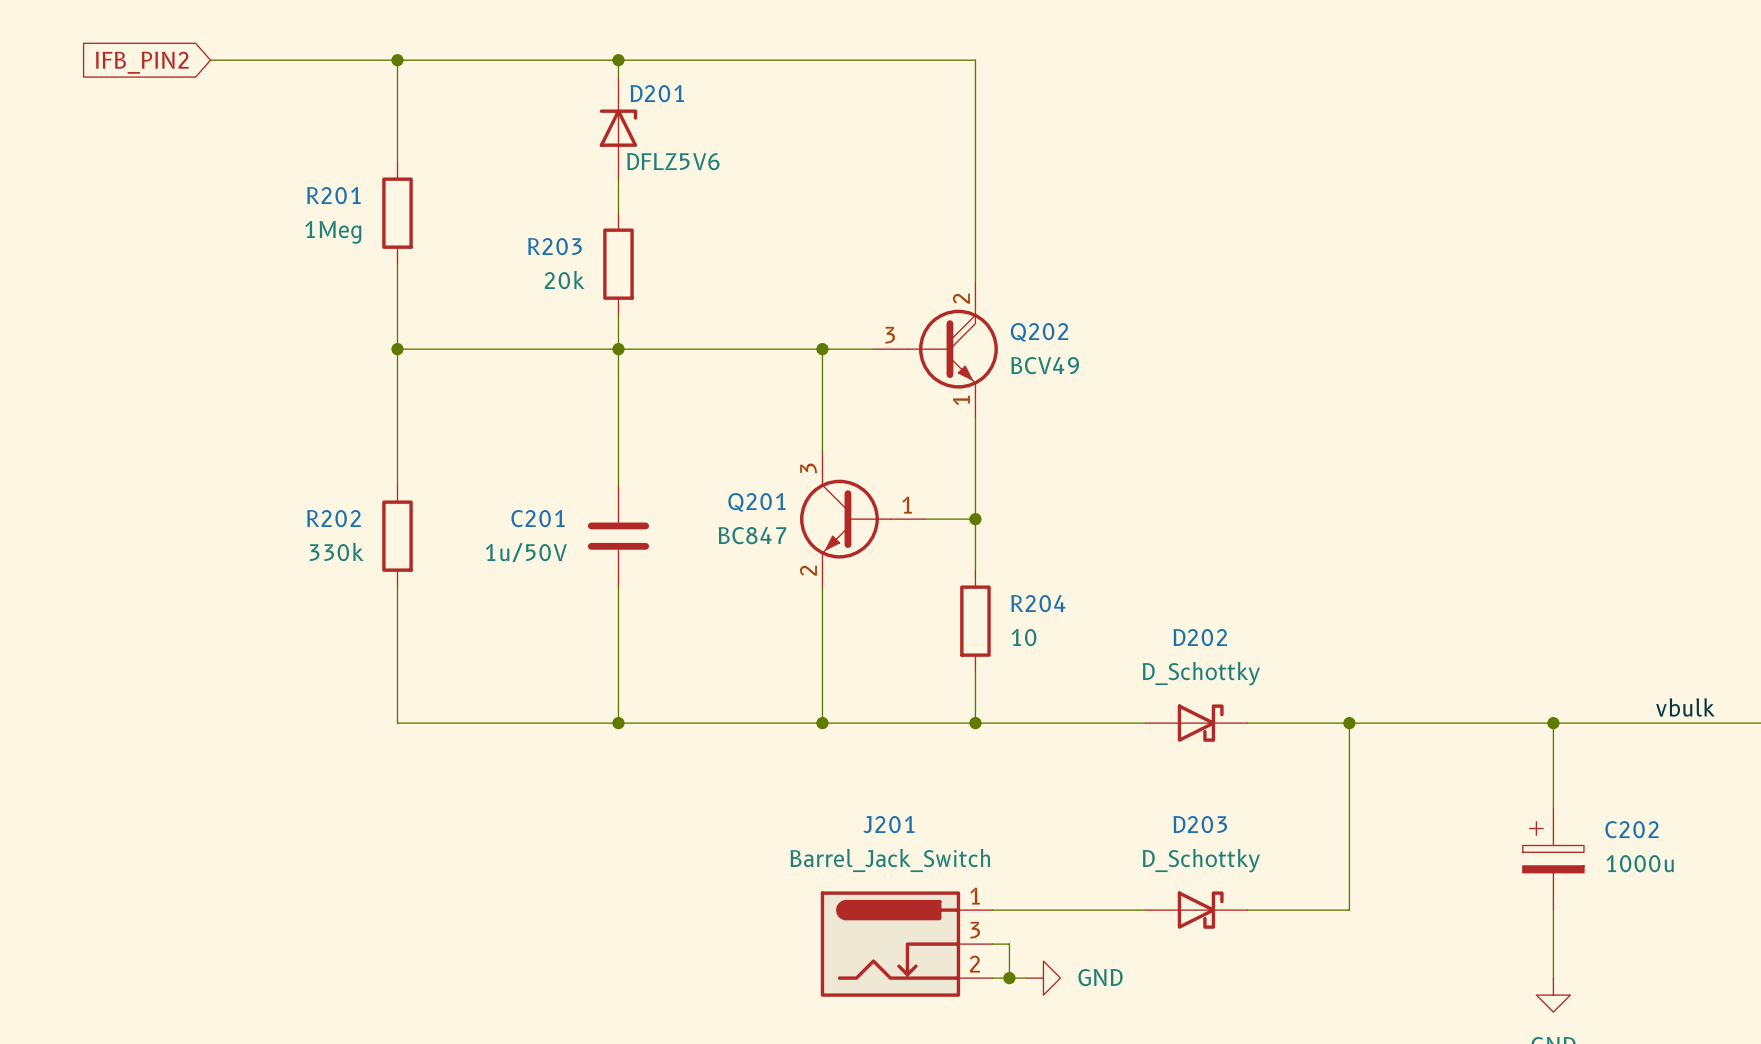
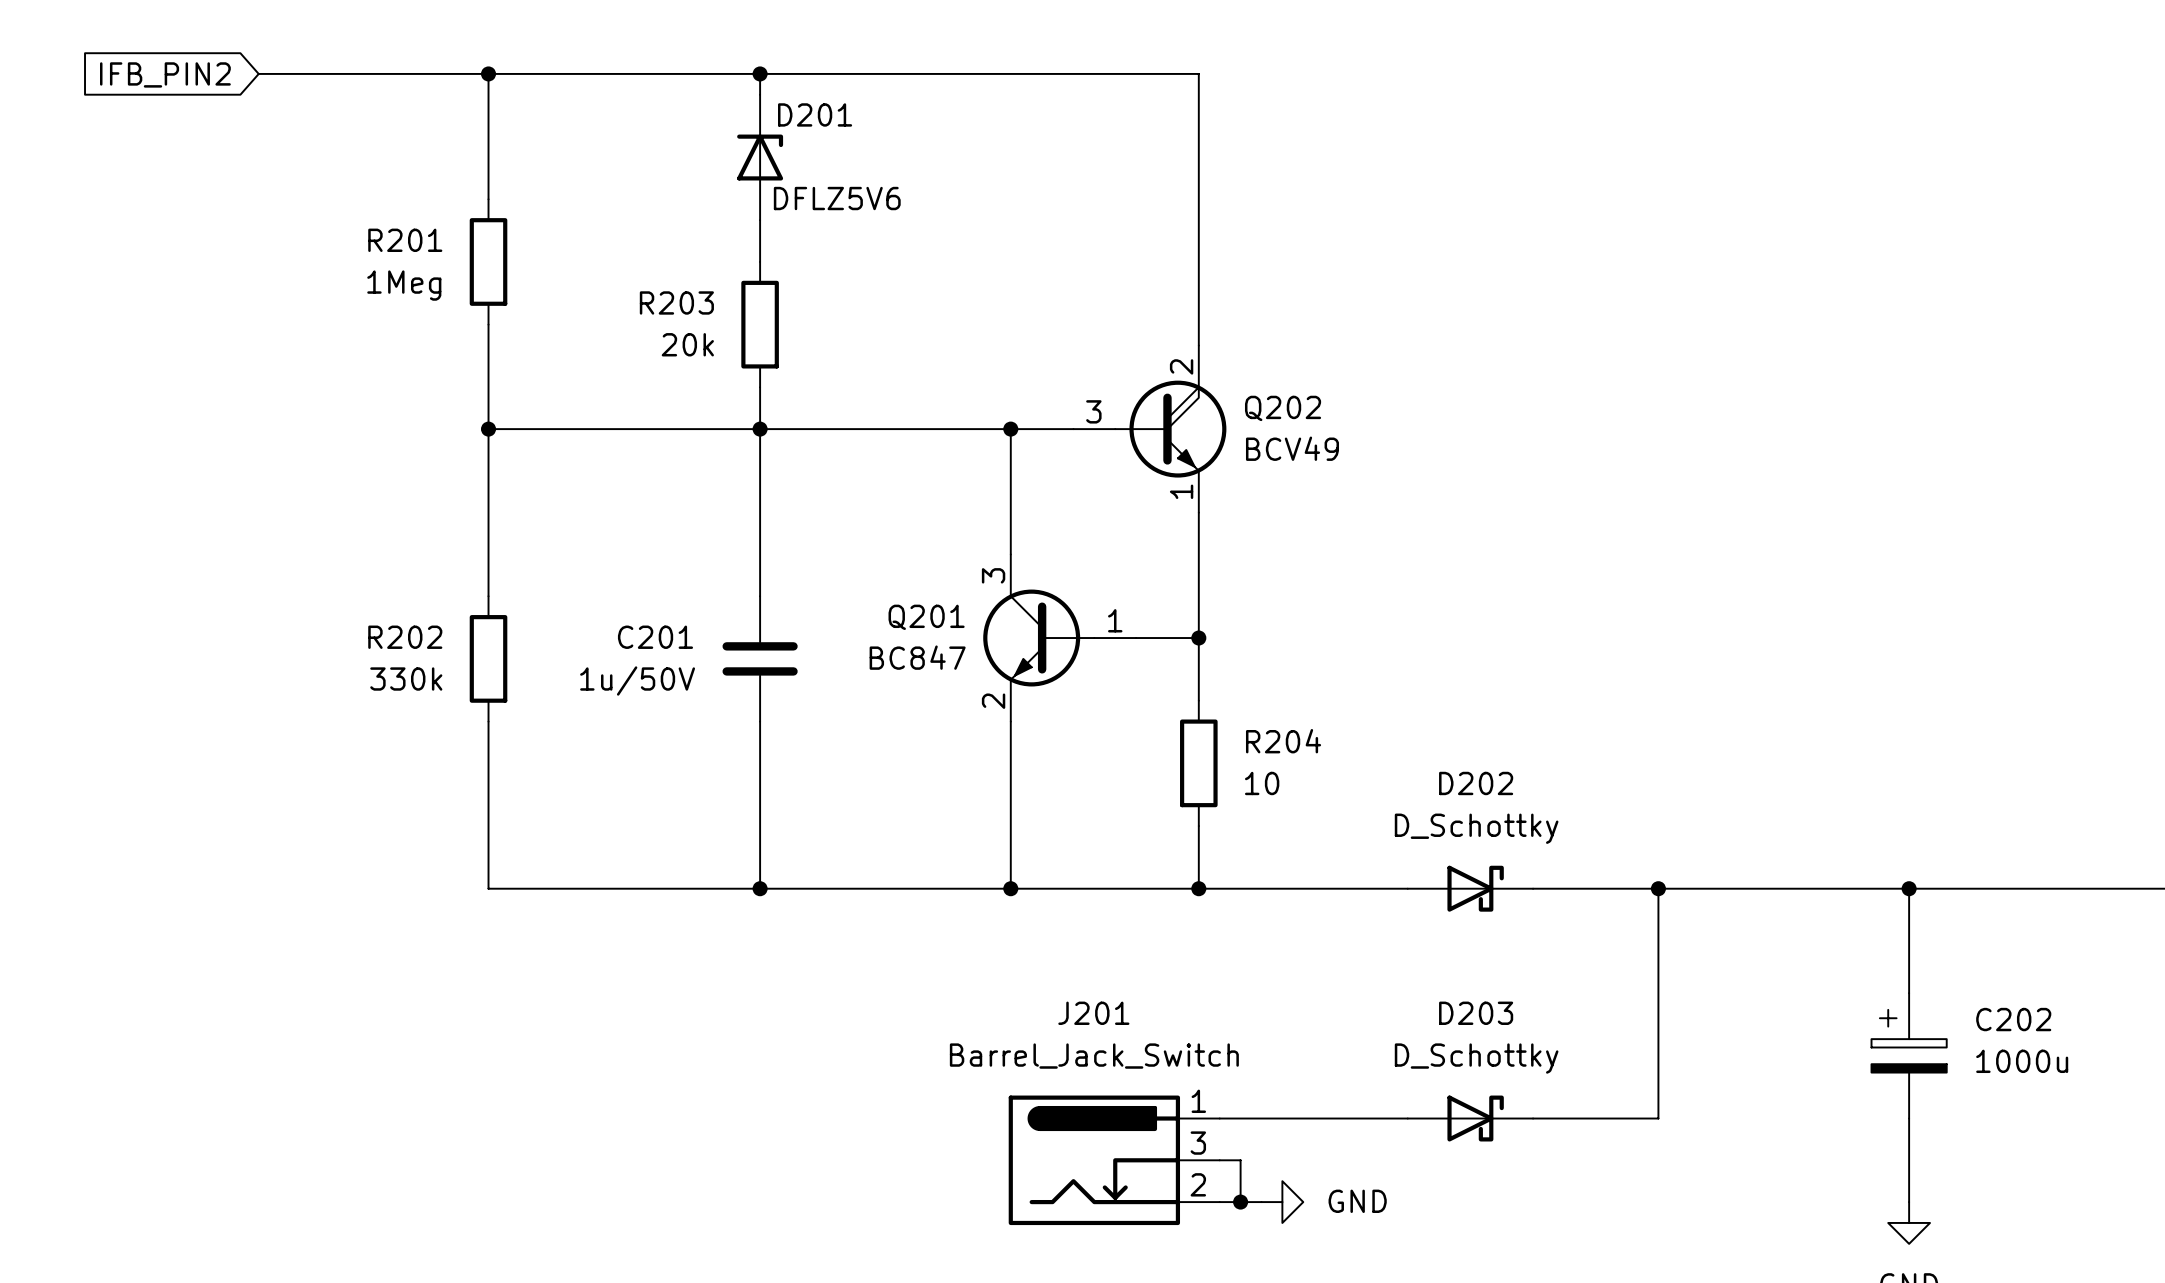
label: vbulk (1685, 707) -> none

